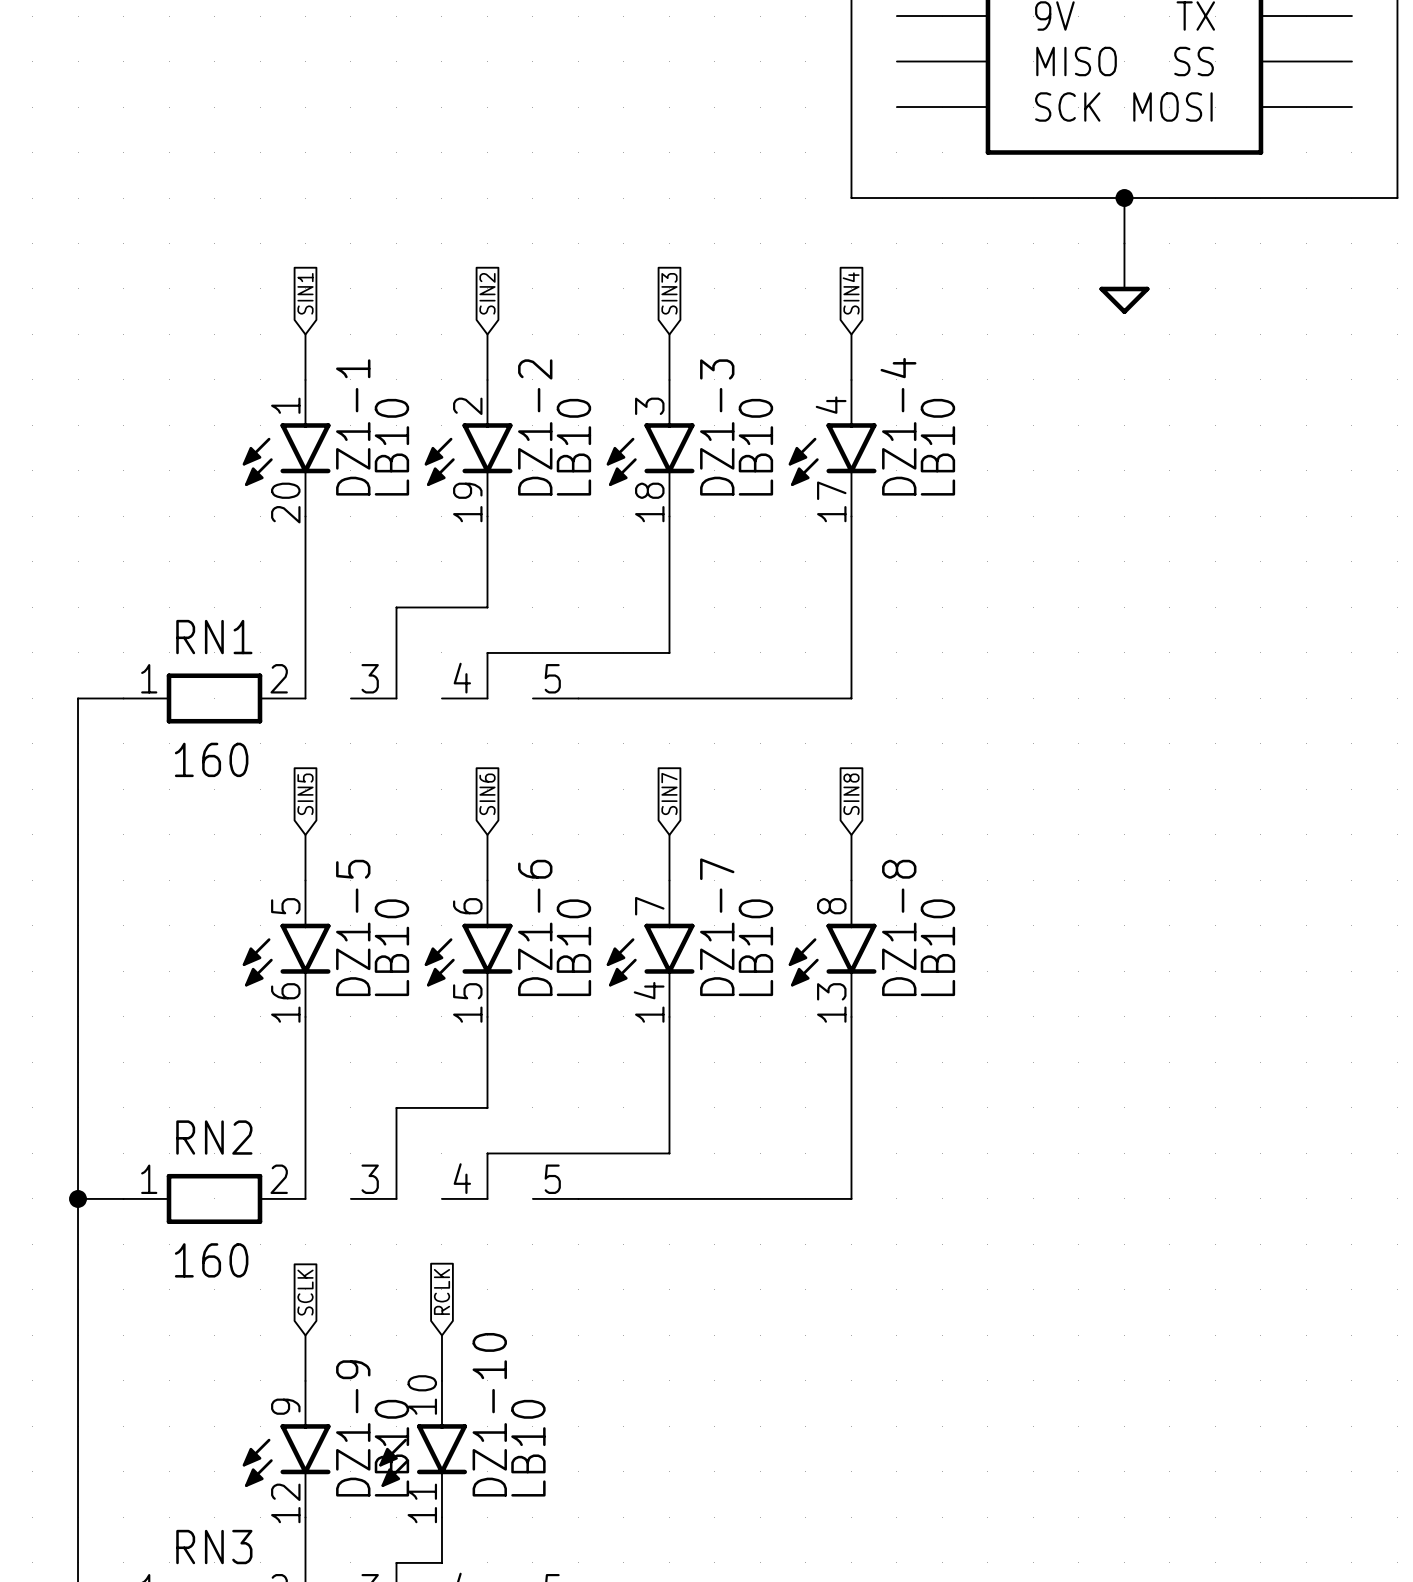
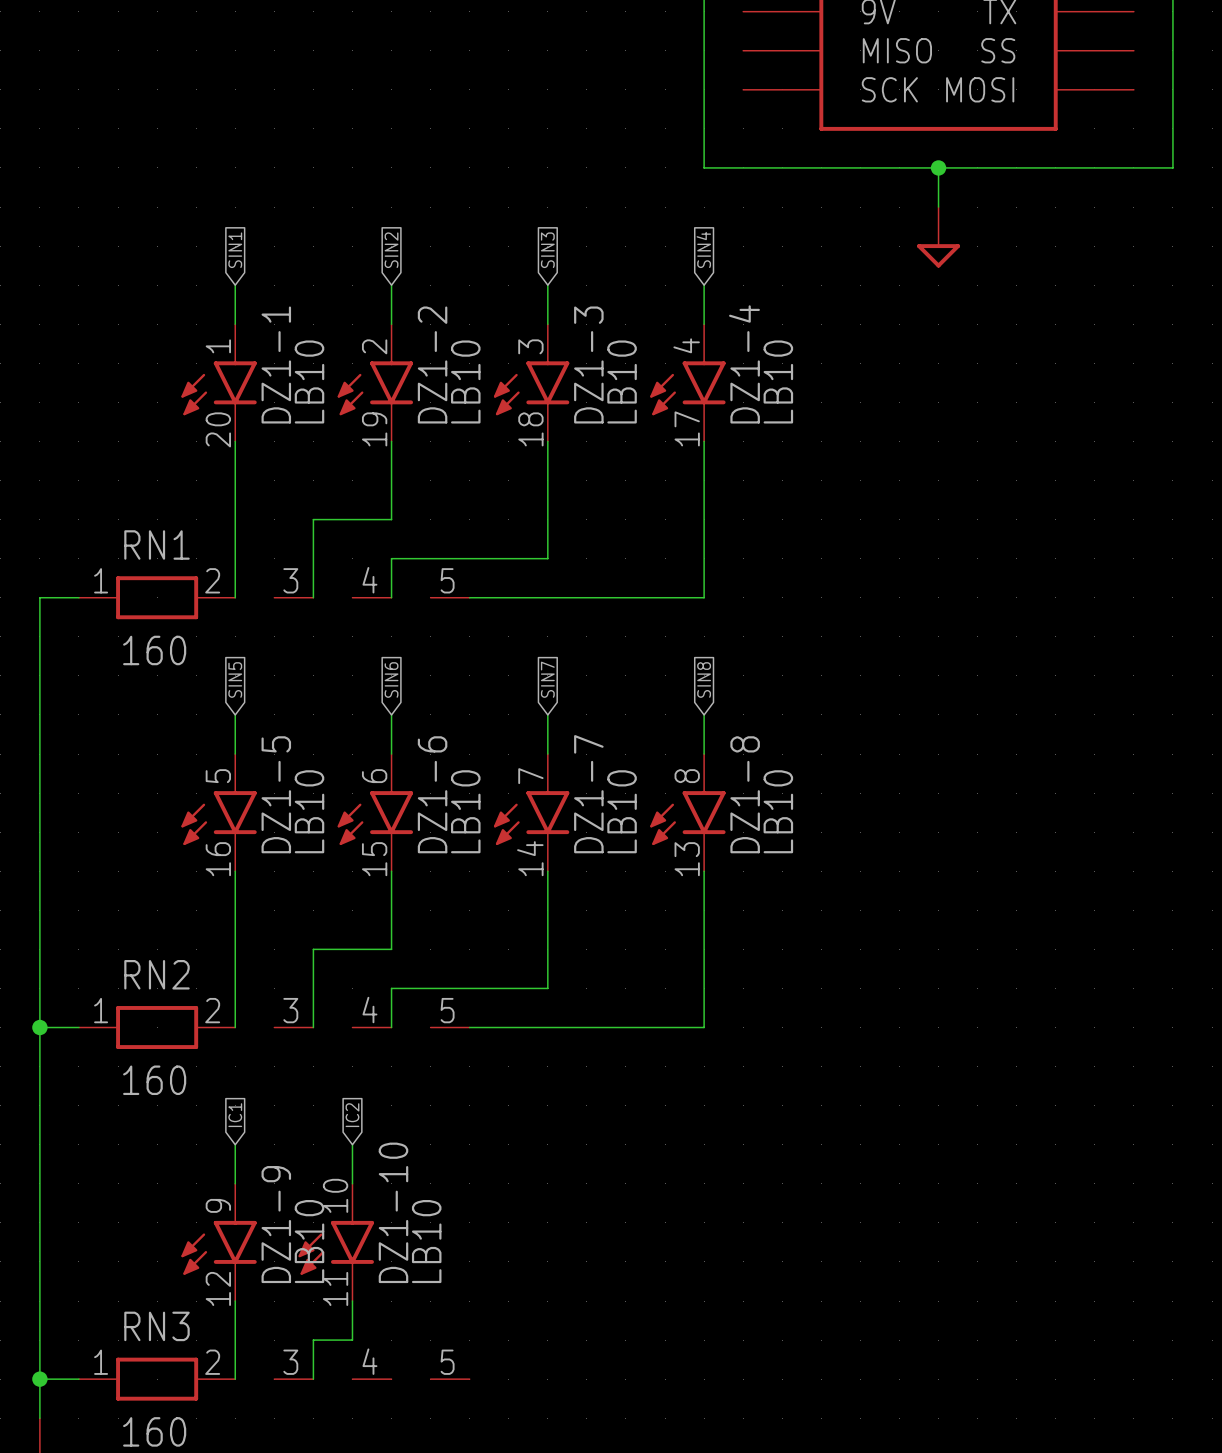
global label: RCLK (441, 1291) -> IC2 (352, 1115)
global label: SCLK (305, 1292) -> IC1 (235, 1115)

